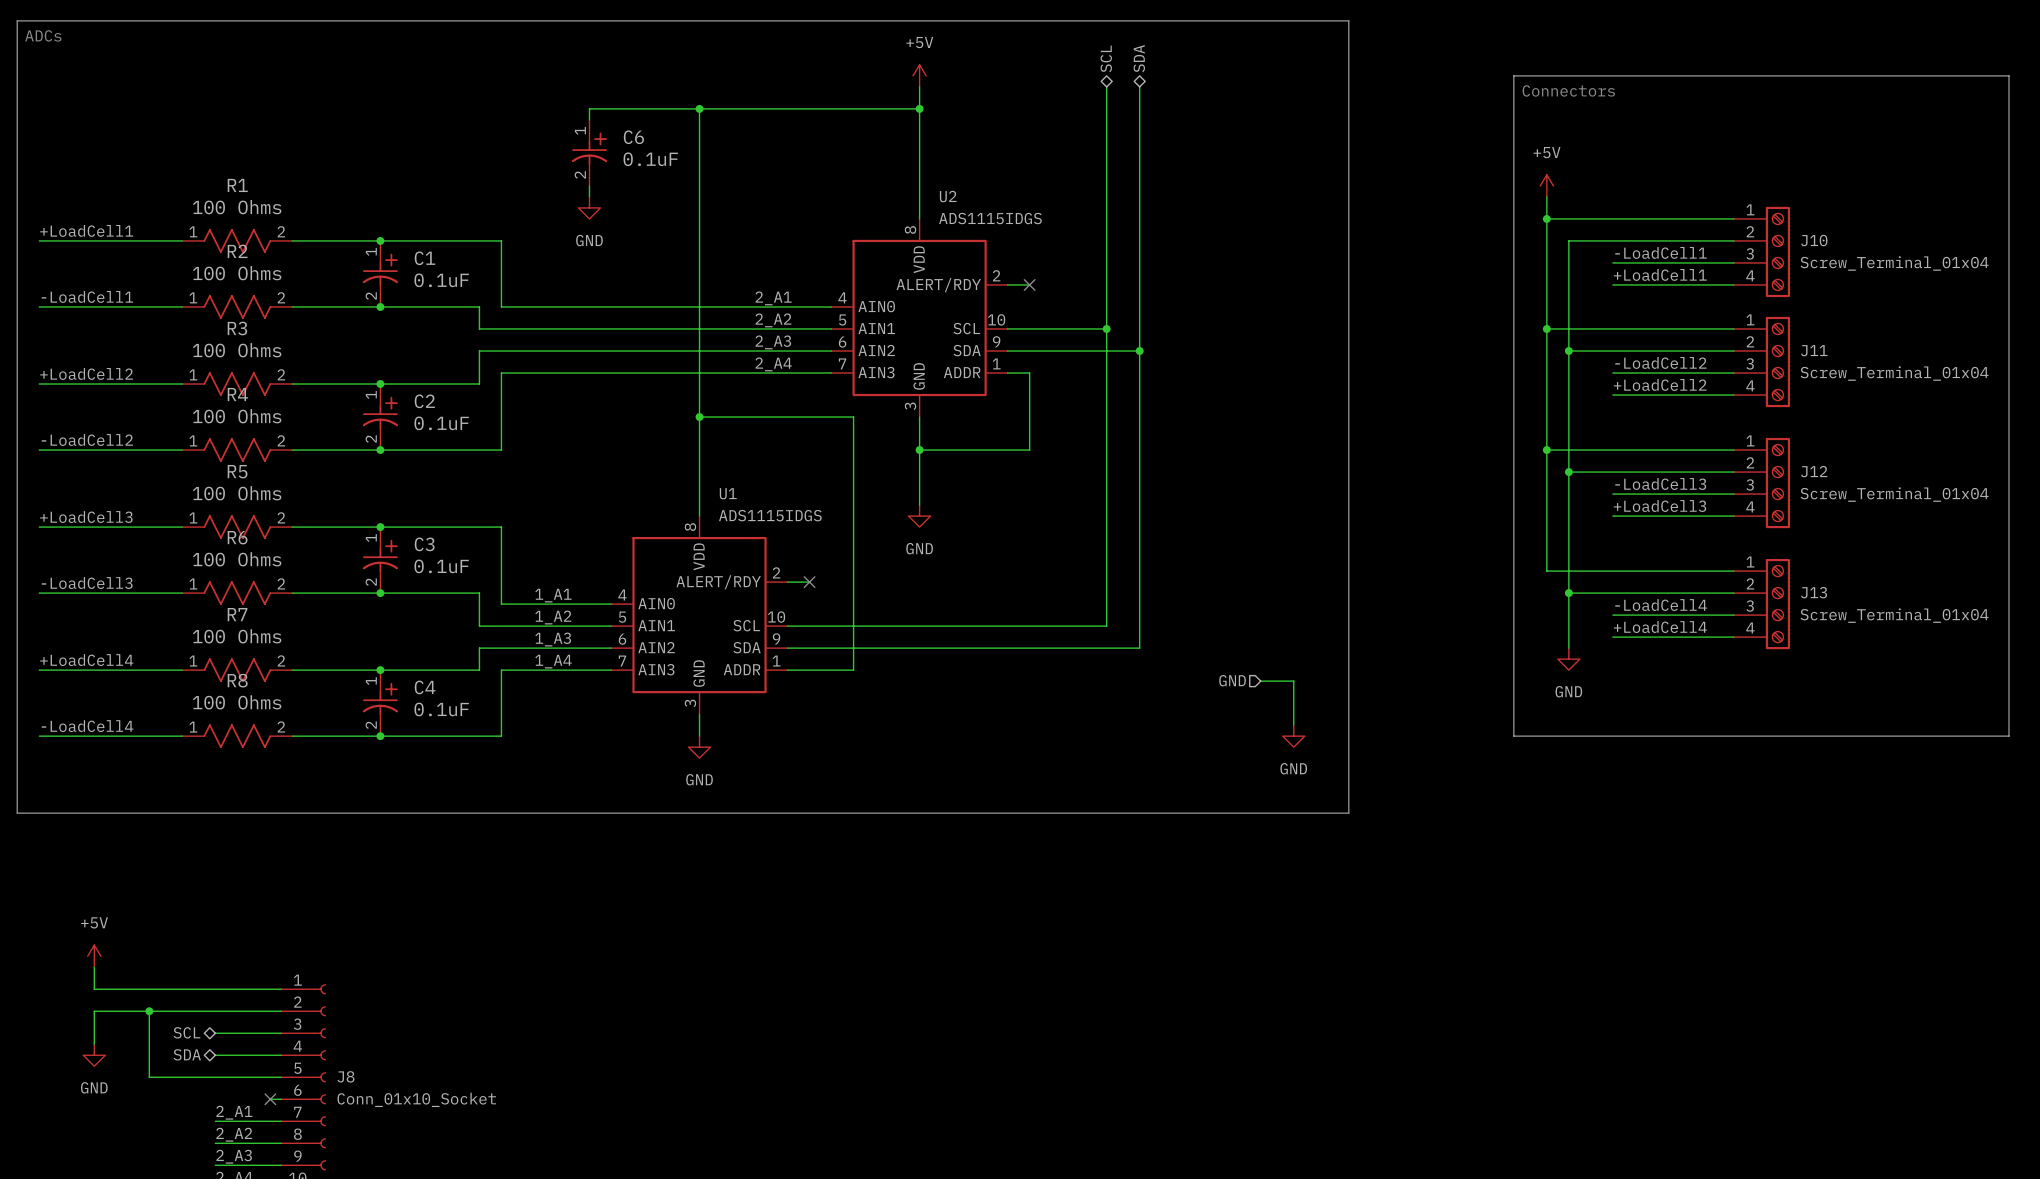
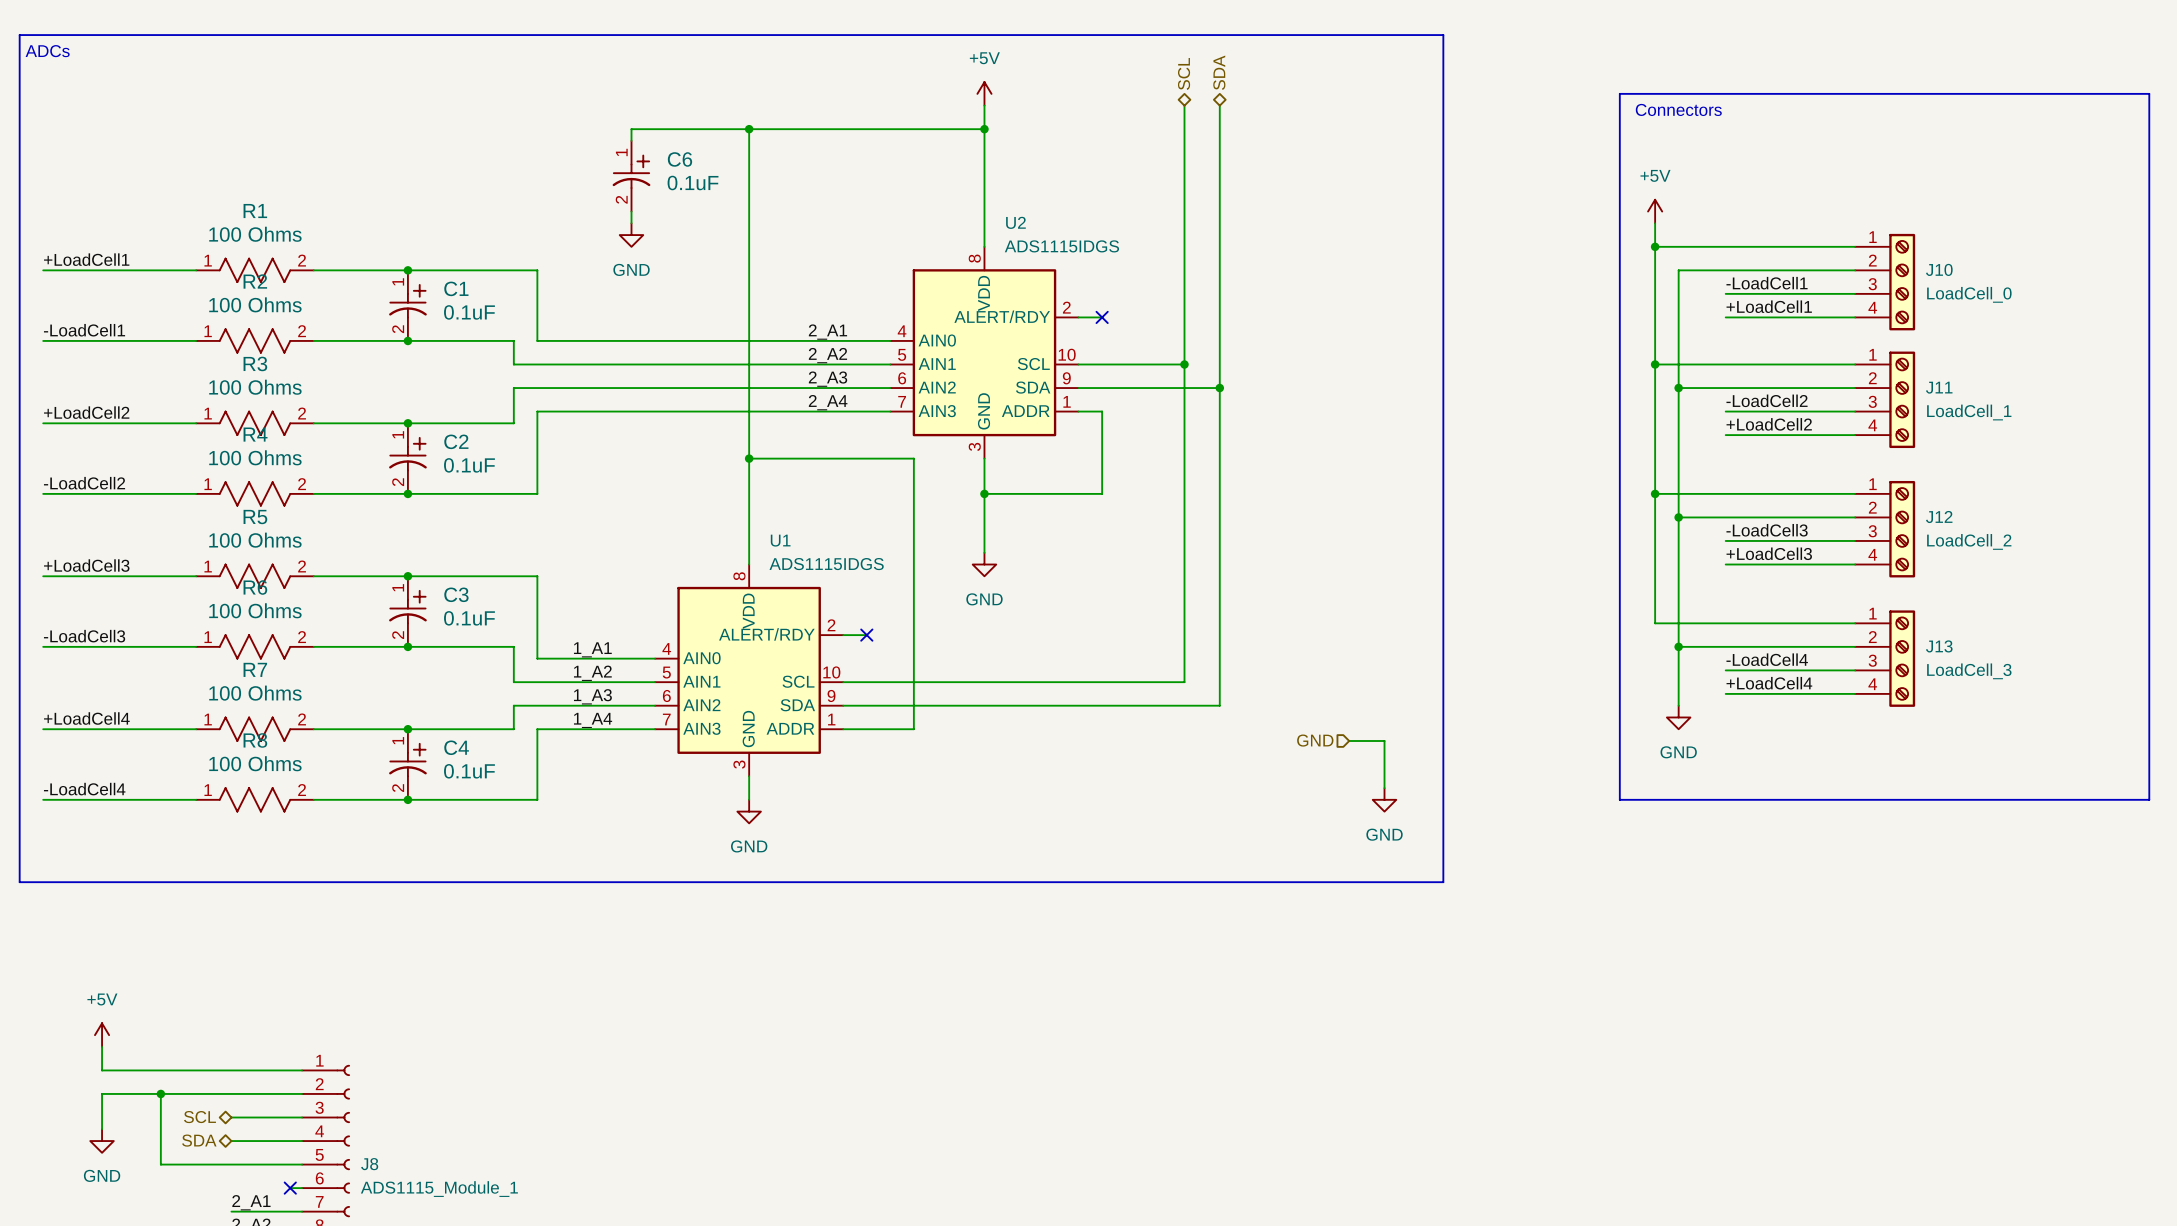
J10 value: Screw_Terminal_01x04 (1894, 263) -> LoadCell_0 (1969, 294)
J11 value: Screw_Terminal_01x04 (1894, 373) -> LoadCell_1 (1969, 412)
J12 value: Screw_Terminal_01x04 (1894, 494) -> LoadCell_2 (1969, 541)
J13 value: Screw_Terminal_01x04 (1894, 615) -> LoadCell_3 (1969, 671)
J8 value: Conn_01x10_Socket (416, 1099) -> ADS1115_Module_1 (439, 1189)

